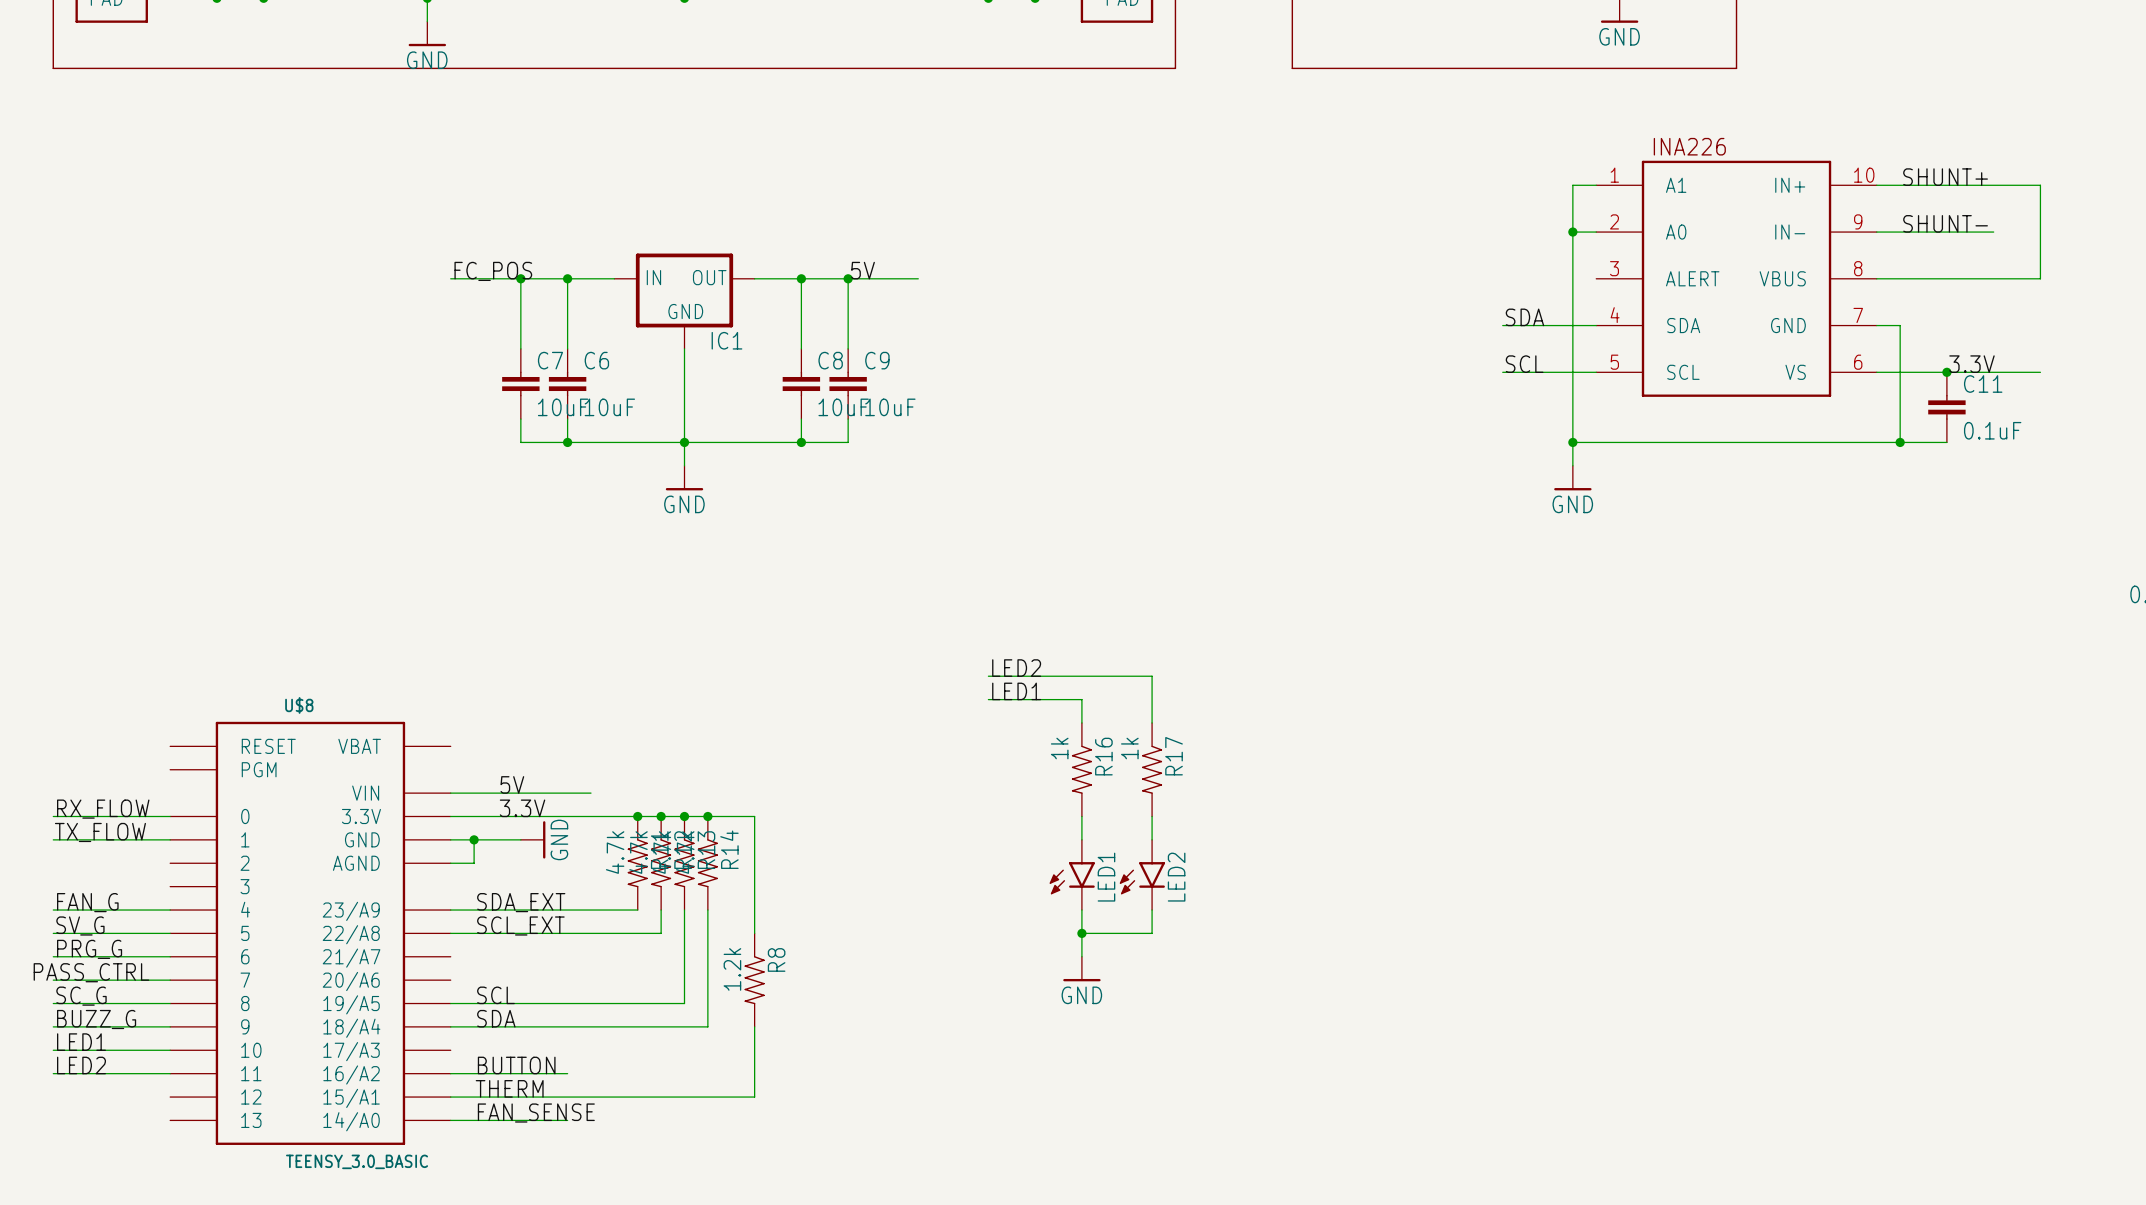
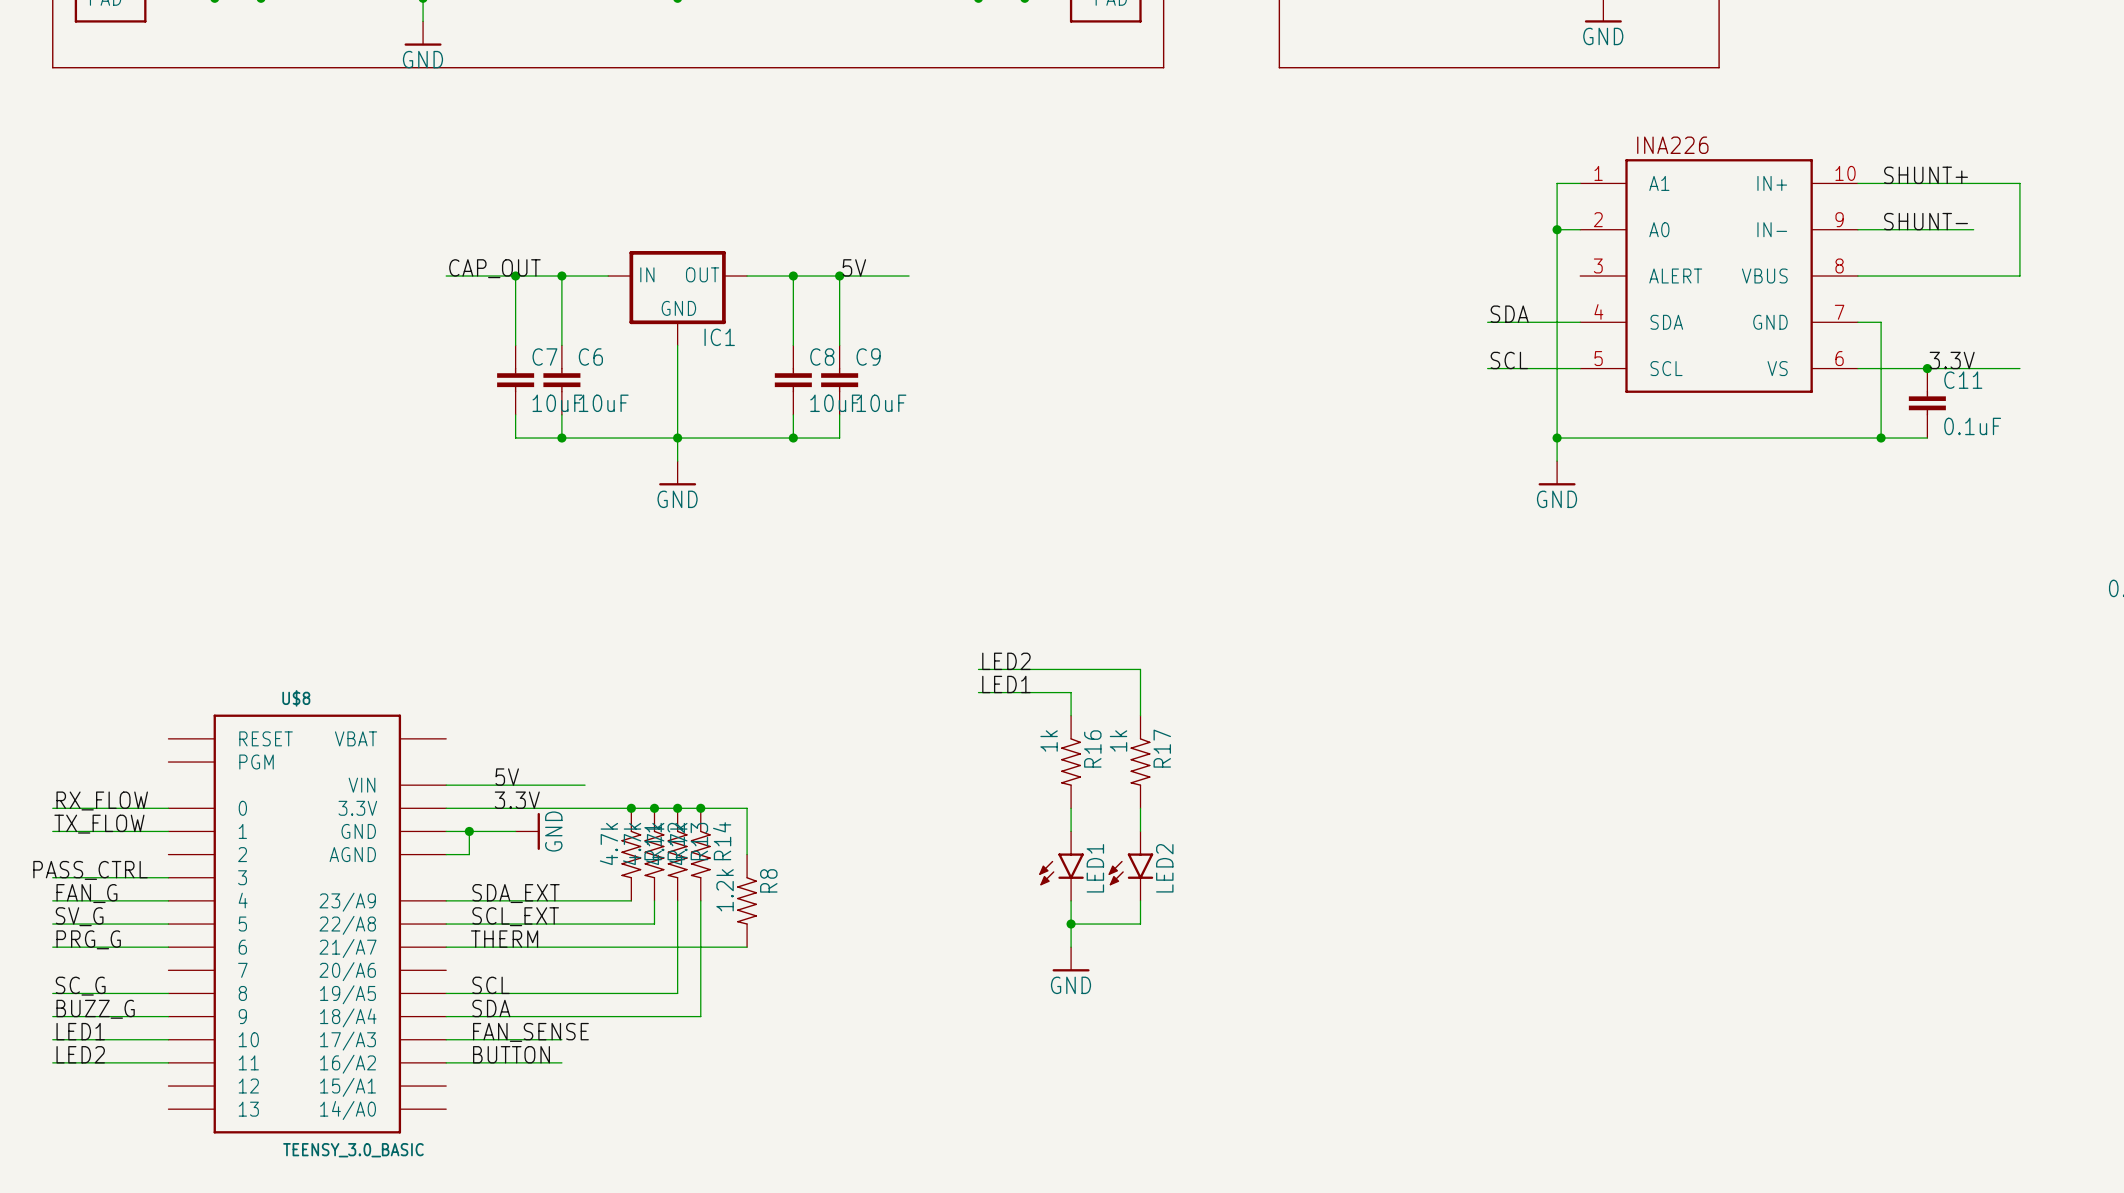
label: FC_POS (493, 271) -> CAP_OUT (494, 268)
wire: (754, 863) (754, 933) -> none
wire: none -> (446, 947) (747, 947)
label position: PASS_CTRL (91, 972) -> PASS_CTRL (90, 870)
wire: (53, 980) (170, 980) -> (52, 877) (168, 877)
R8 position: (754, 980) -> (747, 900)
wire: (754, 1026) (754, 1097) (450, 1097) -> none
label position: THERM (509, 1088) -> THERM (504, 939)
label position: FAN_SENSE (536, 1113) -> FAN_SENSE (530, 1032)
wire: (450, 1120) (567, 1120) -> (446, 1039) (561, 1039)

